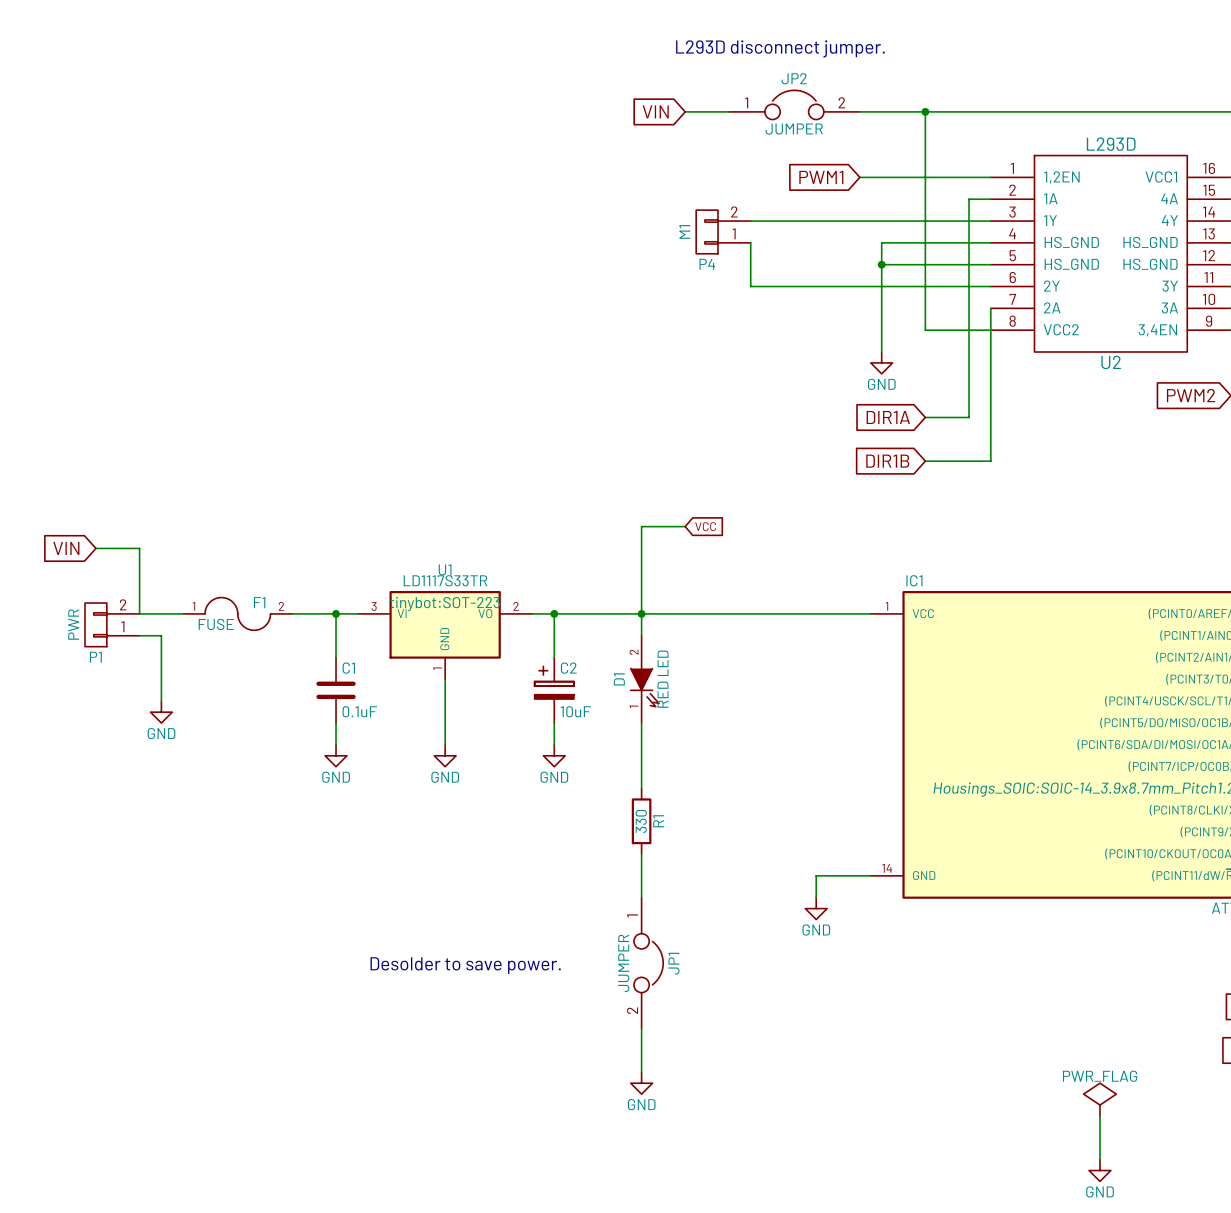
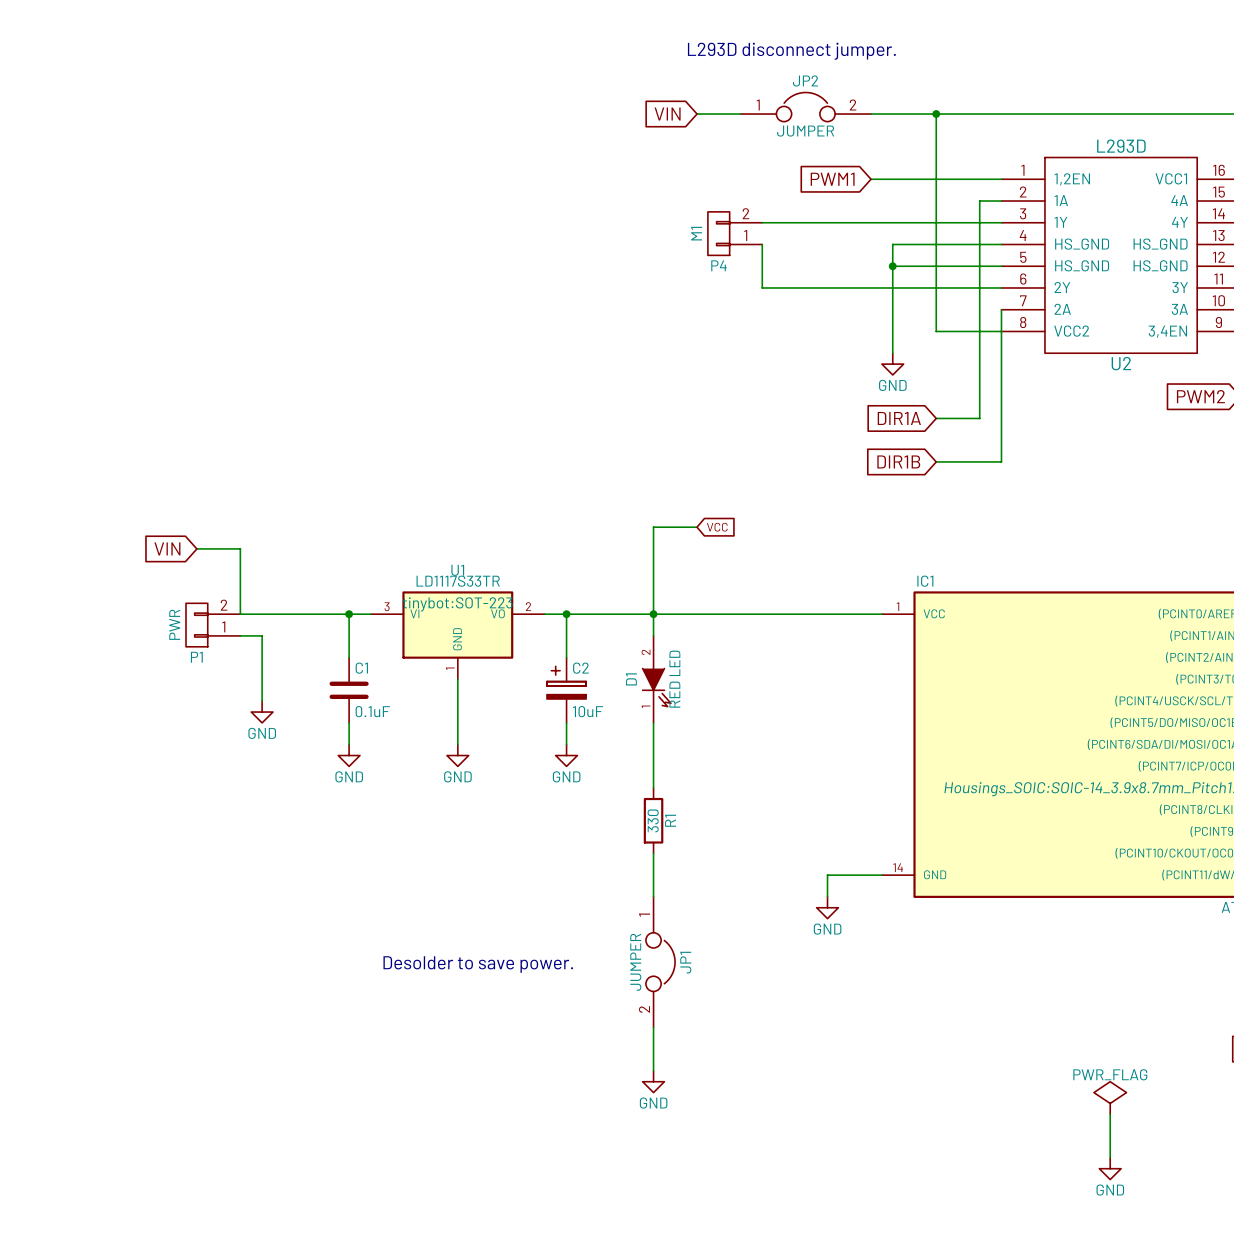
global label position: VIN (66, 548) -> VIN (167, 548)
wire: (95, 548) (139, 548) (139, 613) (183, 613) -> none
wire: none -> (196, 548) (240, 548) (240, 614) (305, 614)
F1: FUSE (237, 613) -> none
P1 position: (112, 624) -> (213, 625)
wire: (139, 635) (161, 635) (161, 701) -> (240, 635) (262, 635) (262, 701)
power symbol position: GND (161, 712) -> GND (262, 712)

